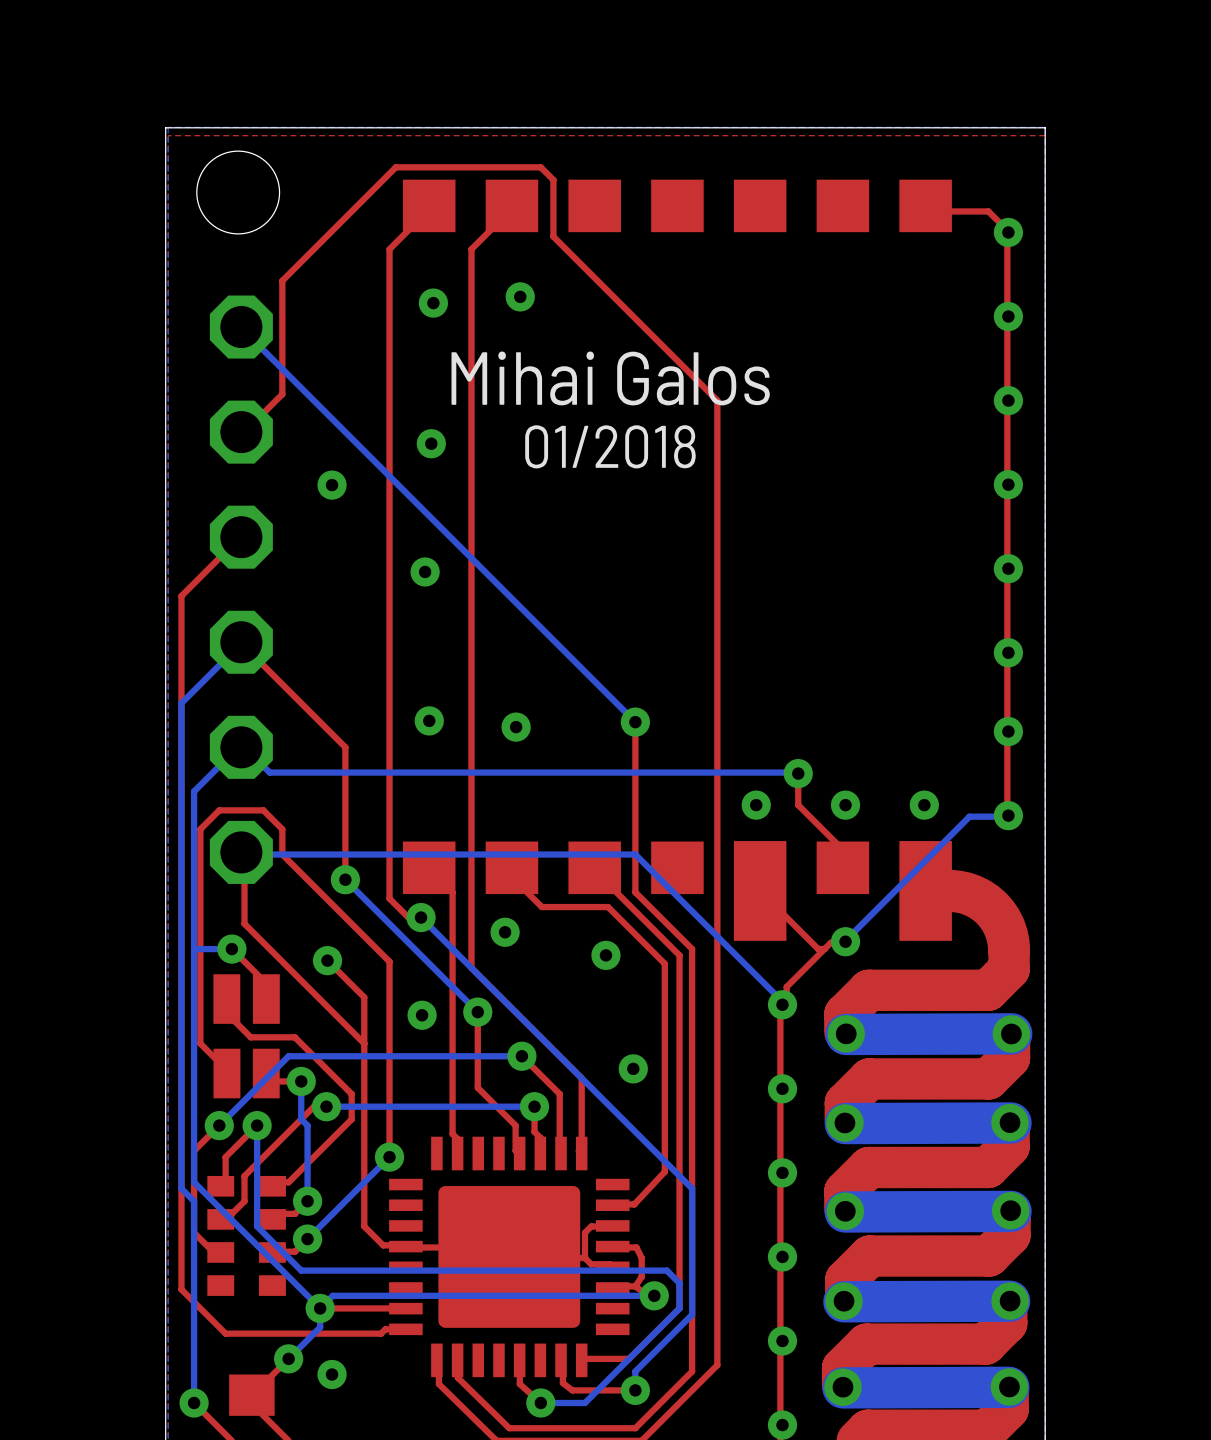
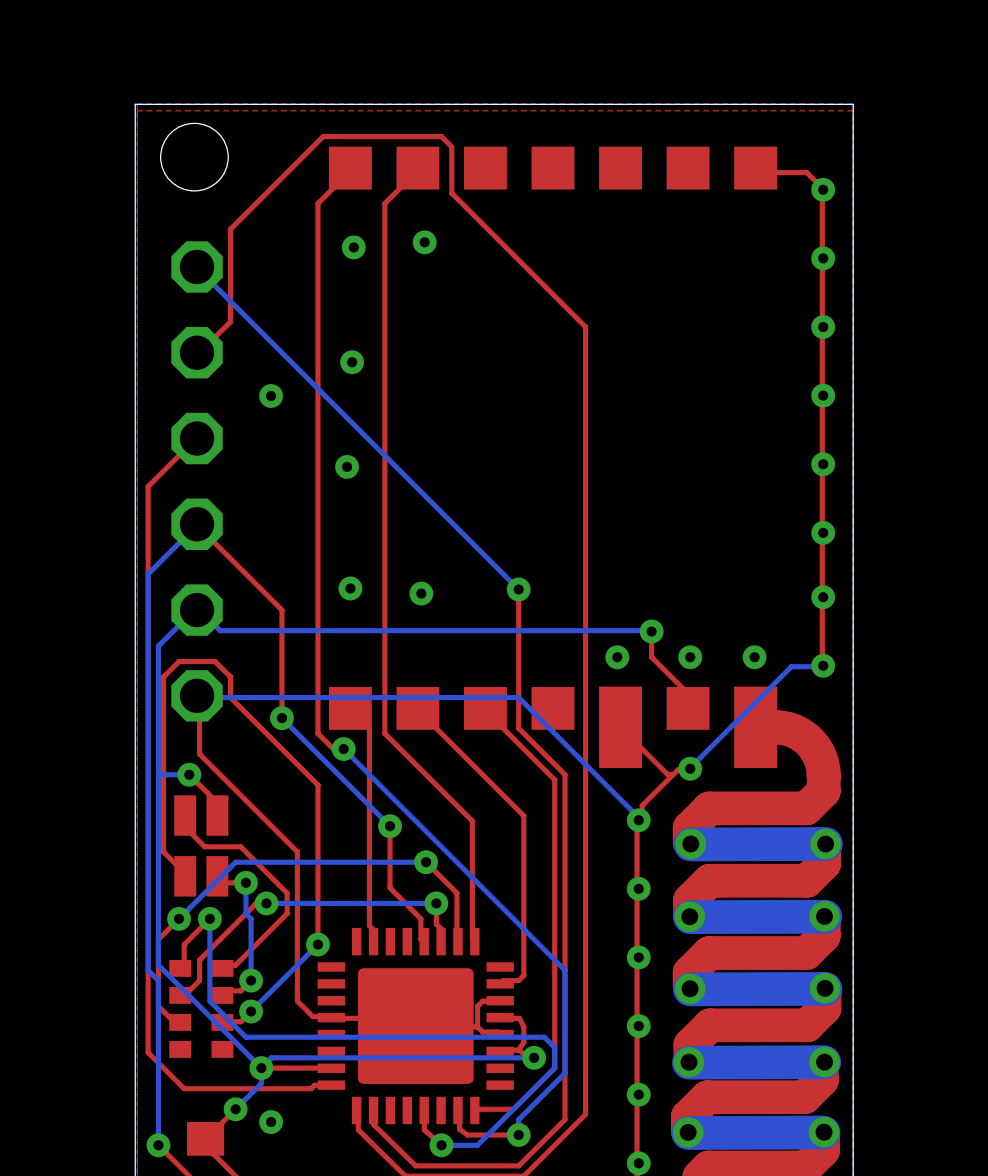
text: Mihai Galos (610, 378) -> none
text: 01/2018 (610, 446) -> none
top track: (515, 873) (515, 880) (541, 907) (608, 907) (664, 963) (664, 1171) (634, 1204) (612, 1205) -> (420, 712) (523, 815) (523, 975) (518, 980) (503, 980) (500, 983)
top track: (471, 898) (471, 967) (581, 1078) (581, 1153) -> (384, 733) (472, 821) (472, 939)
via: (505, 932) -> none
via: (605, 955) -> none
top track: (327, 960) (364, 997) (364, 1043) -> none
via: (327, 960) -> none
via: (422, 1015) -> none
via: (633, 1068) -> none

